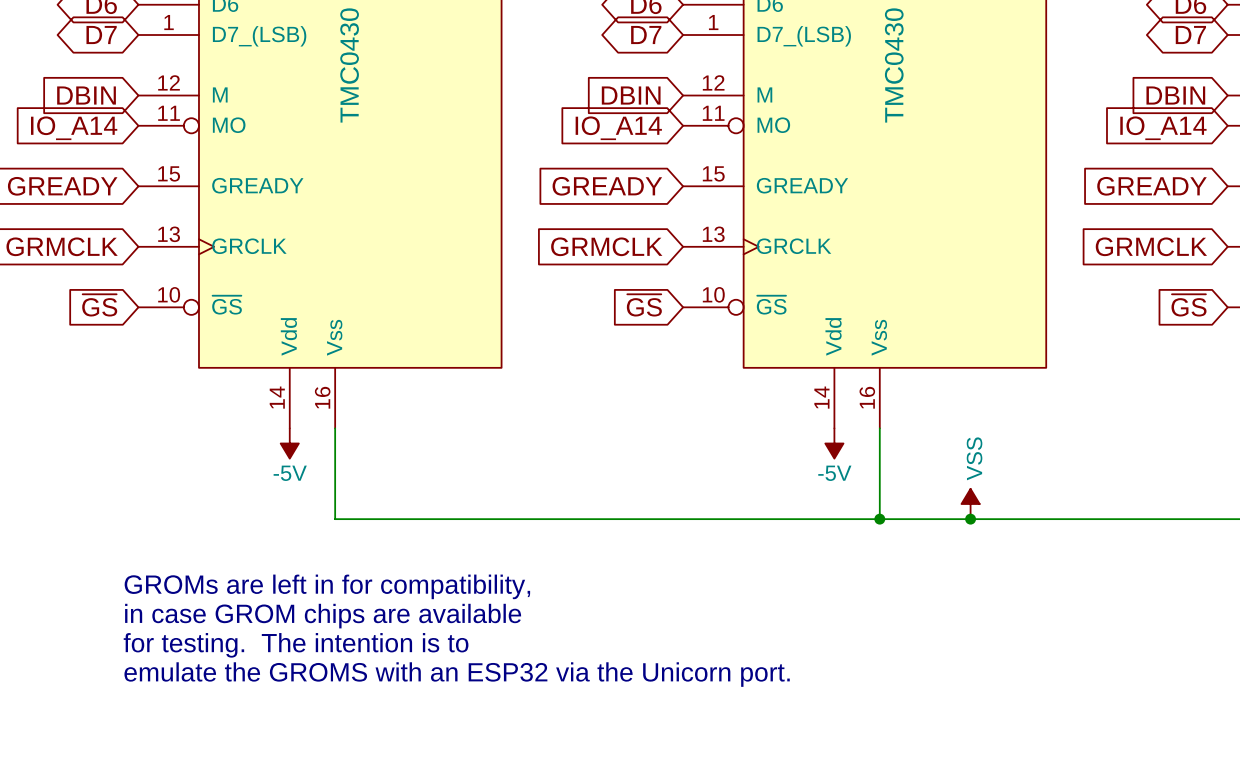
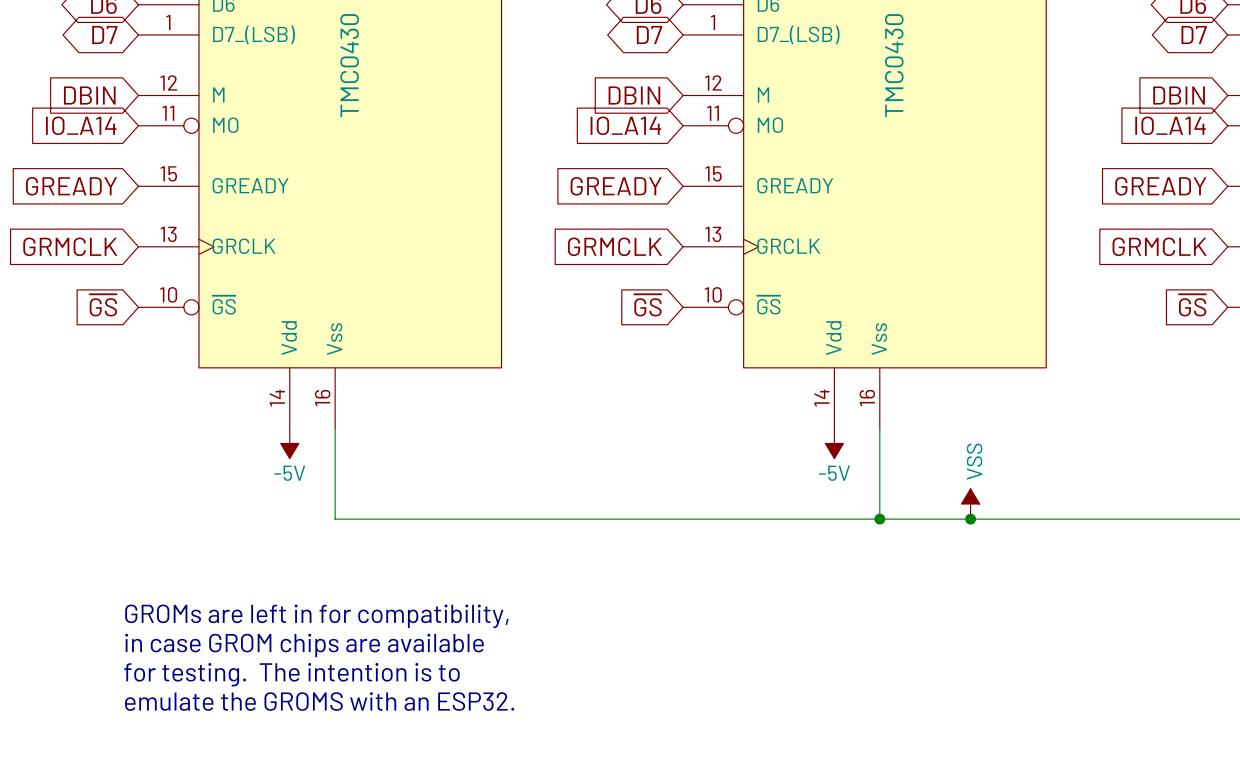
text: GROMs are left in for compatibility, (327, 586) -> none
text: in case GROM chips are available (323, 616) -> GROMs are left in for compatibility, (316, 616)
text: for testing. The intention is to (296, 645) -> in case GROM chips are available (304, 645)
text: emulate the GROMS with an ESP32 via the Unicorn port. (457, 674) -> for testing. The intention is to (291, 674)
text: none -> emulate the GROMS with an ESP32. (319, 701)

